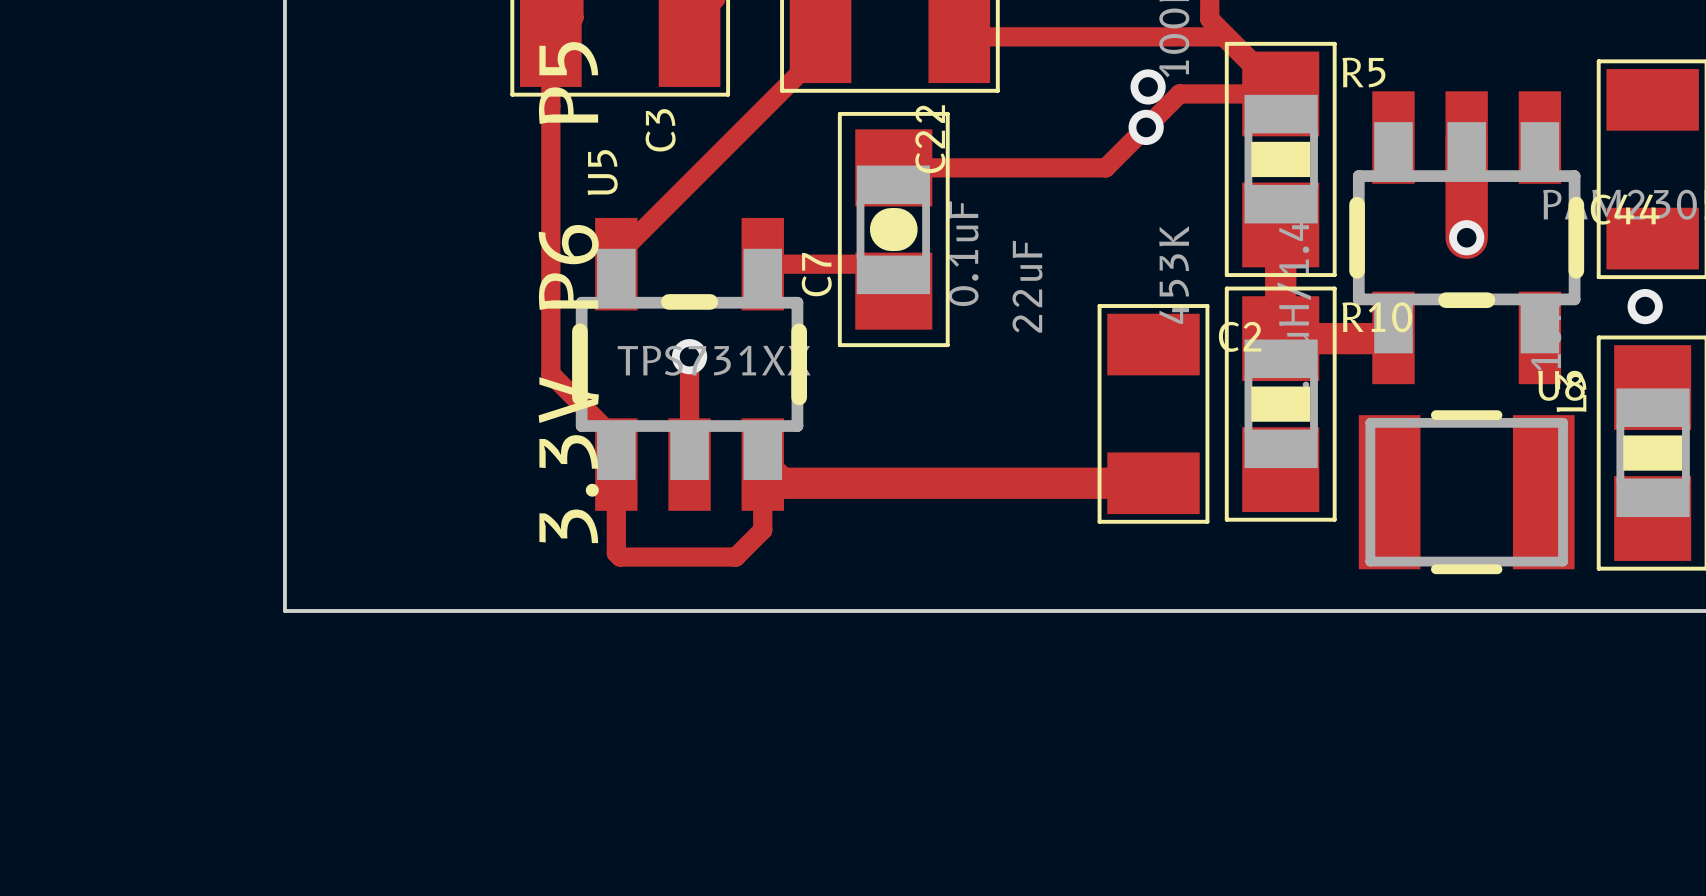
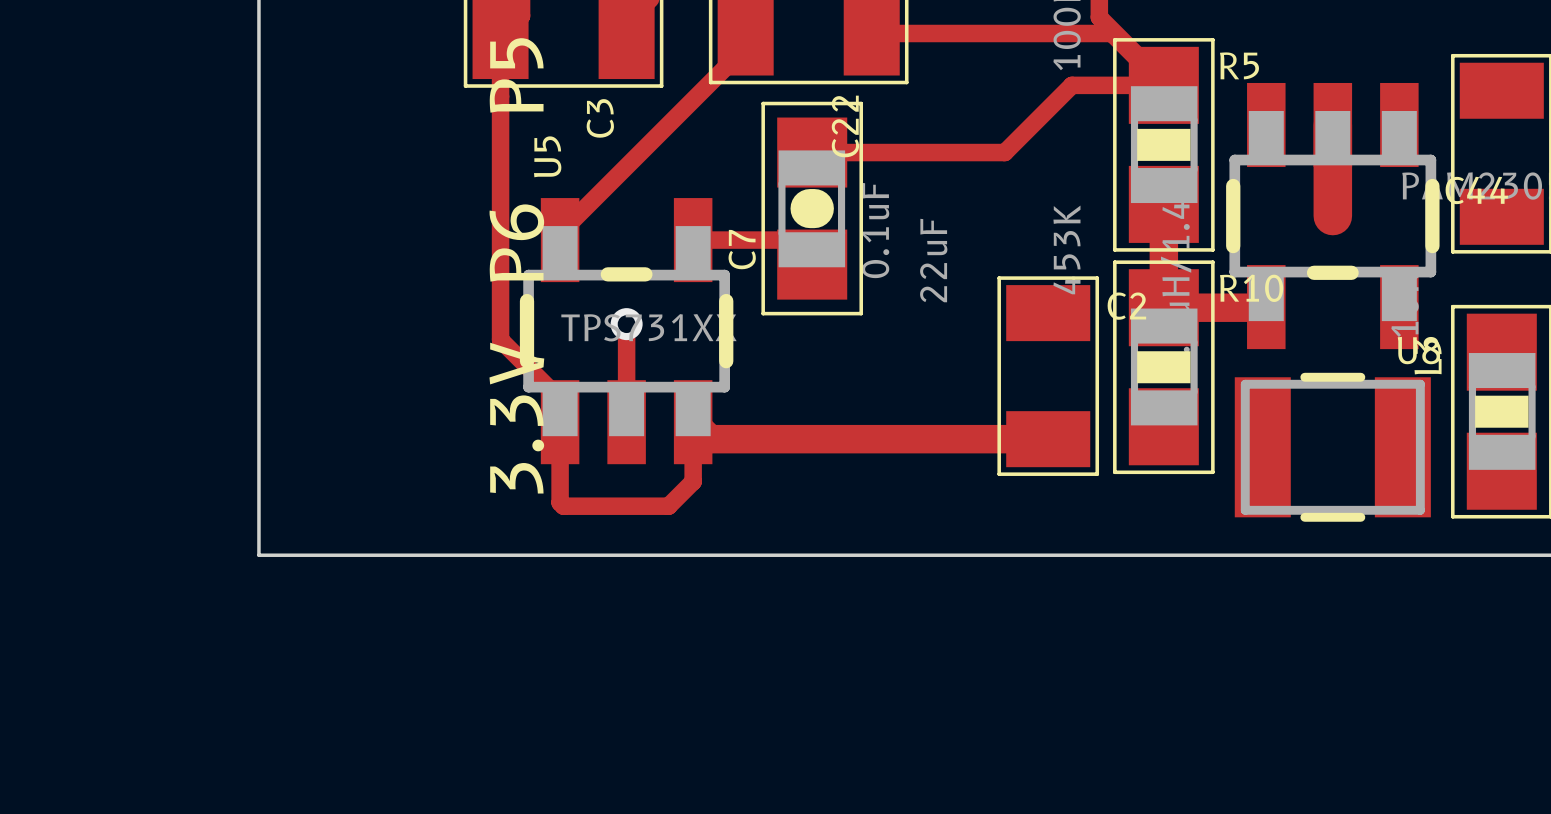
via: (1148, 86) -> none
via: (1146, 127) -> none
via: (1466, 237) -> none
via: (1645, 306) -> none

